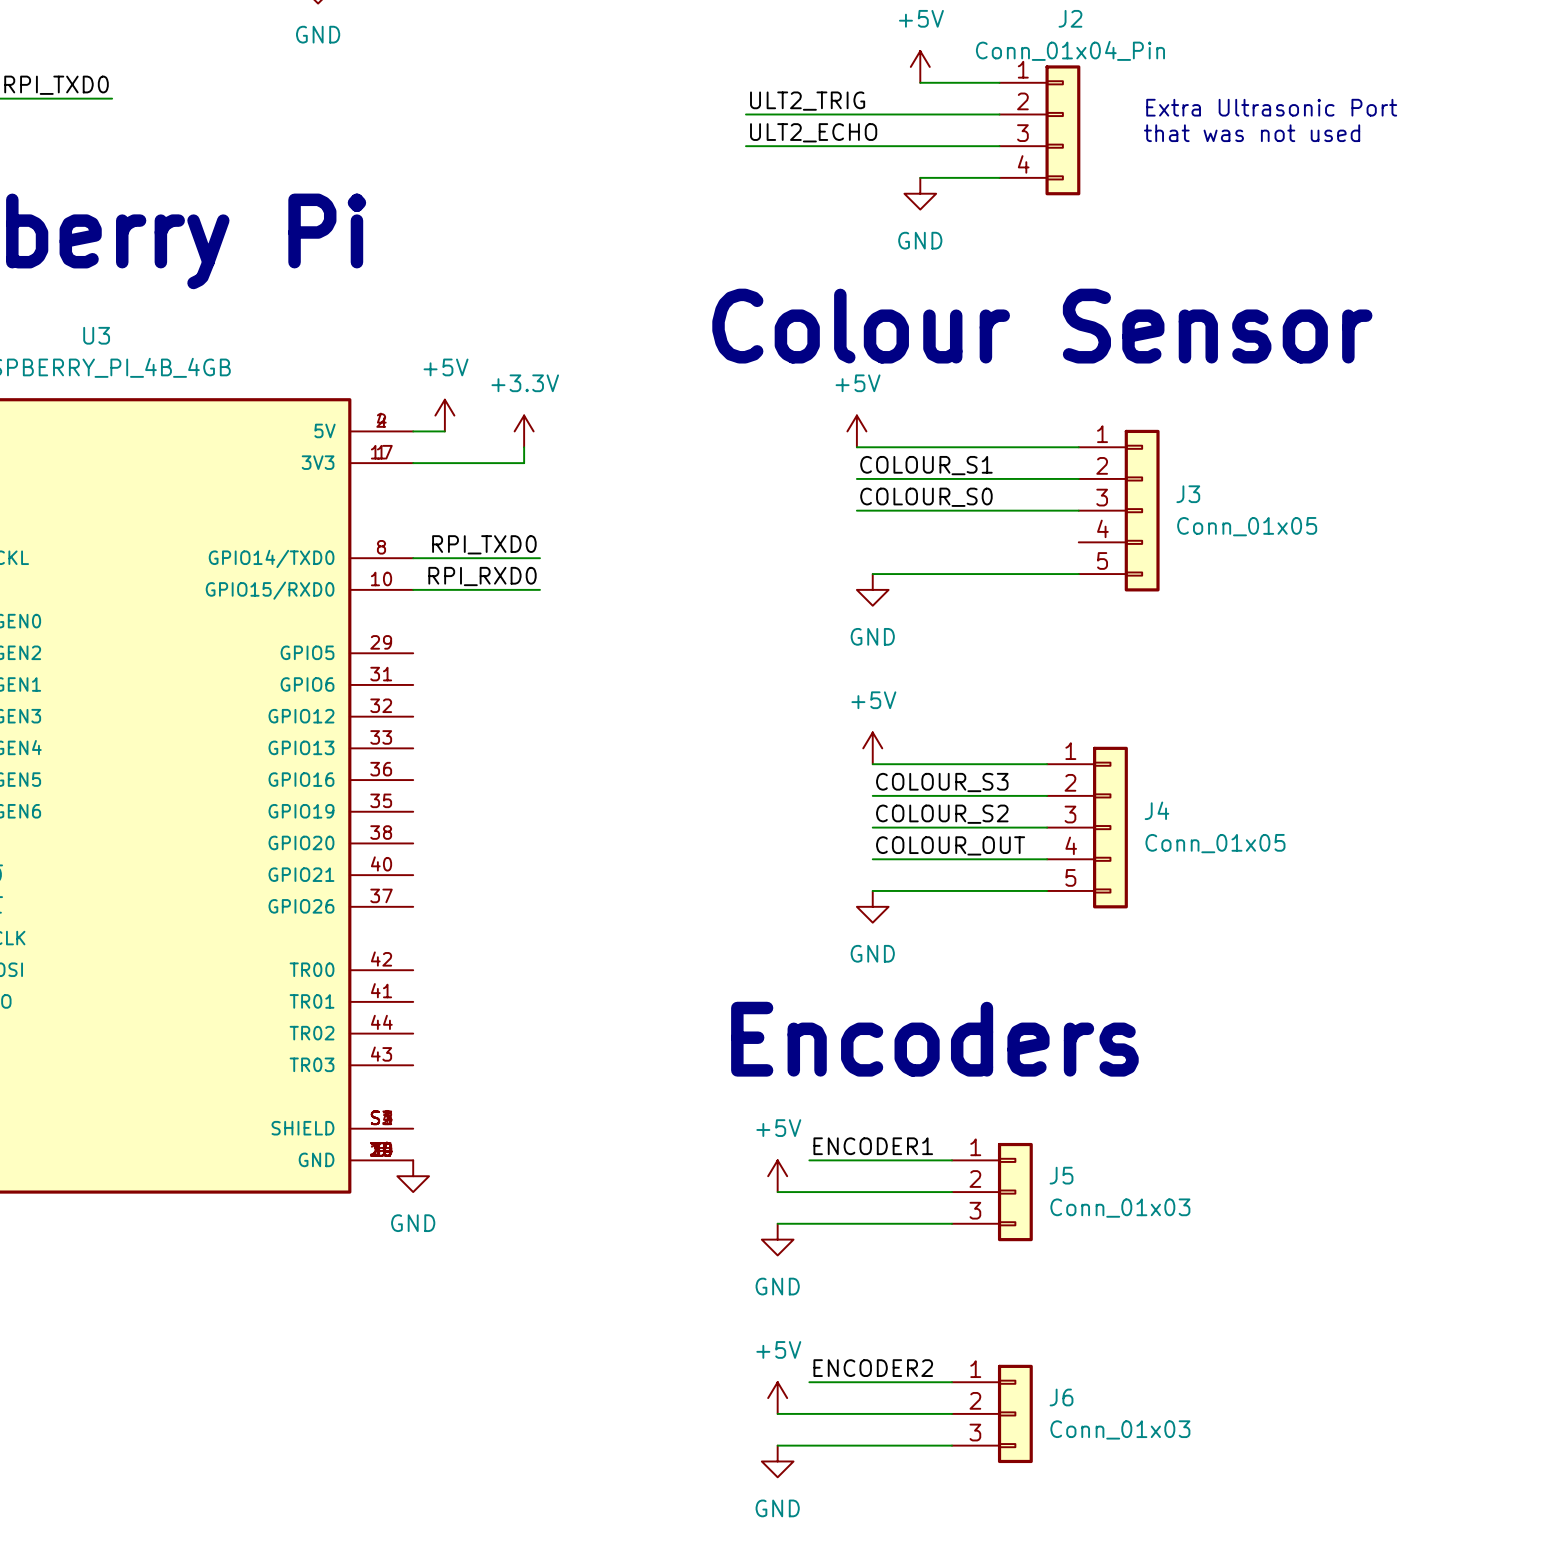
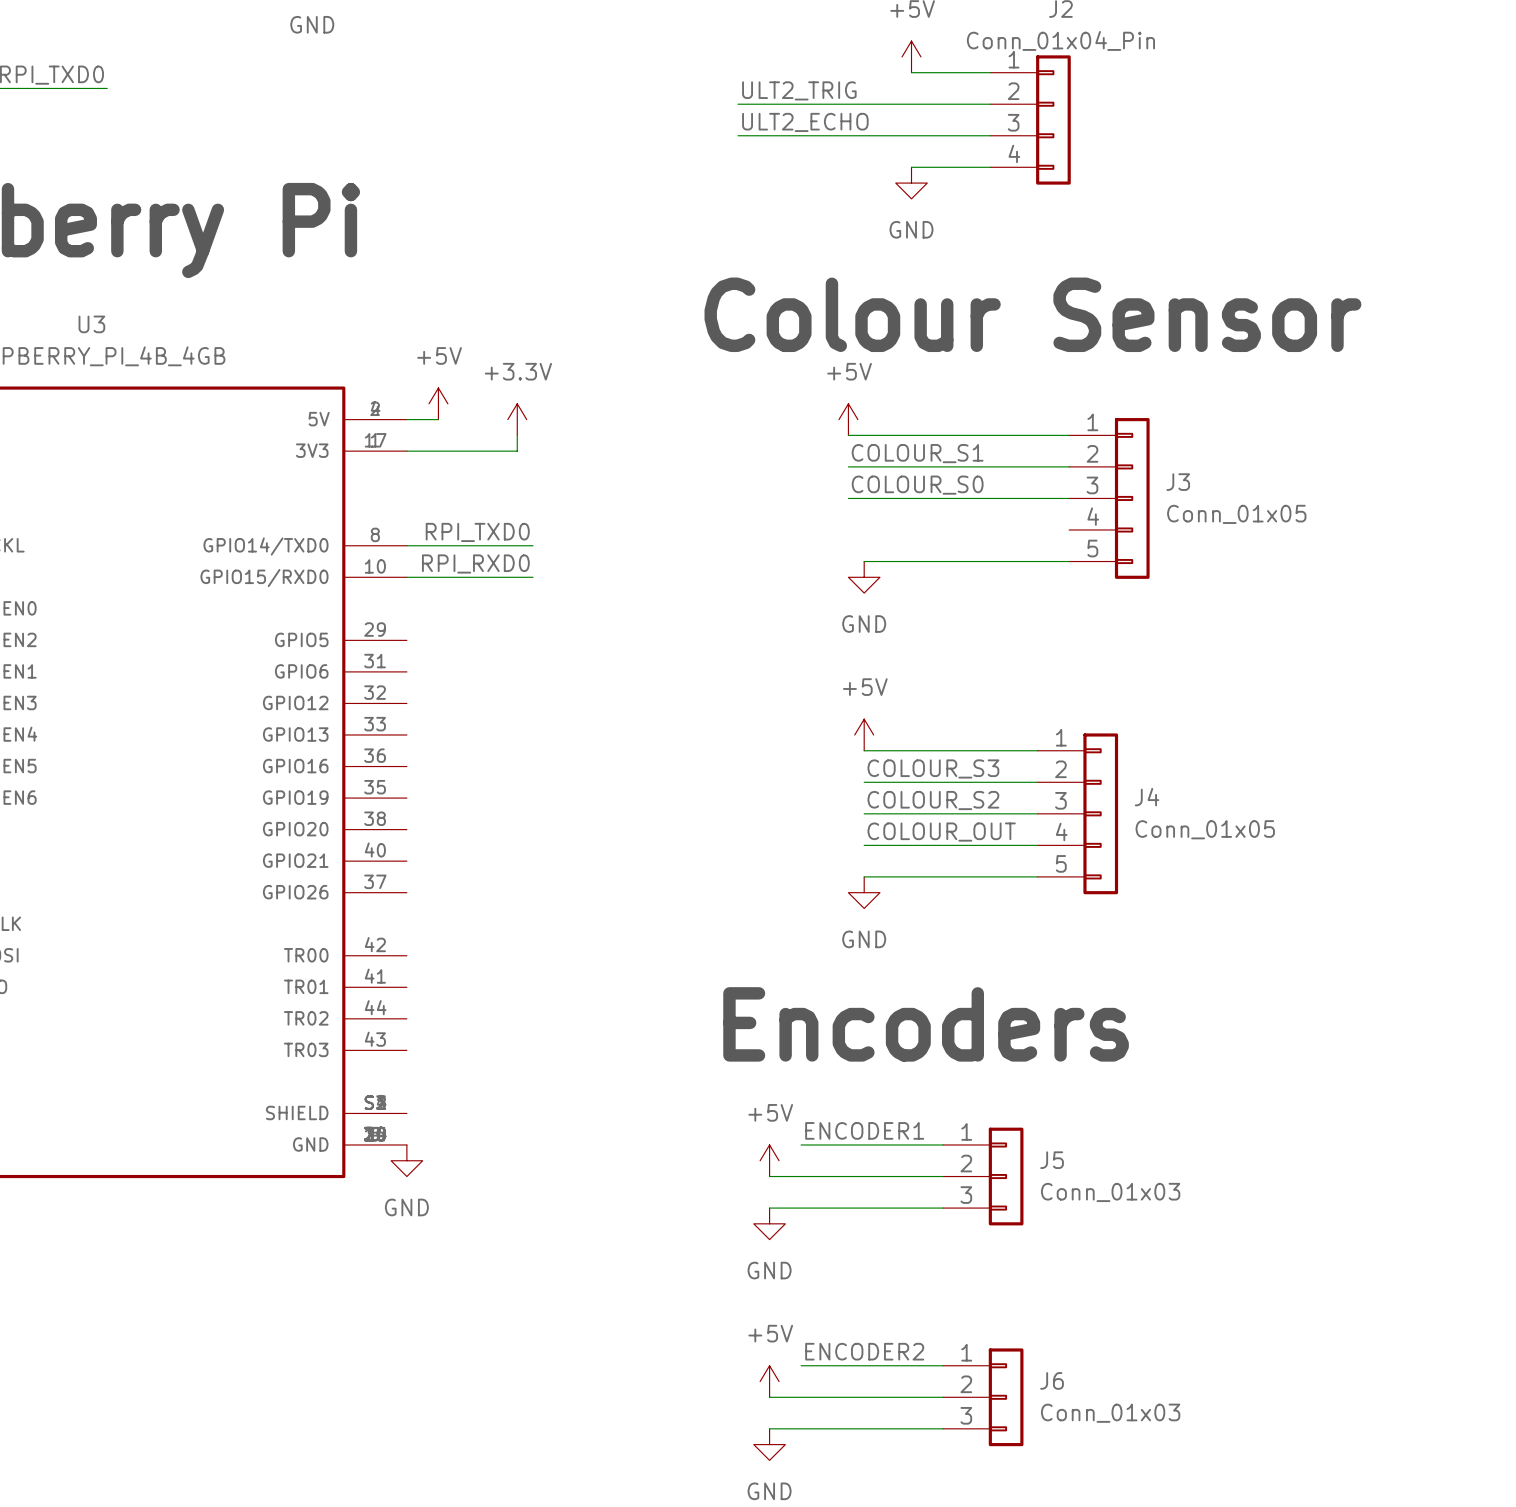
text: Extra Ultrasonic Port (1271, 107) -> none
text: that was not used (1252, 133) -> none

